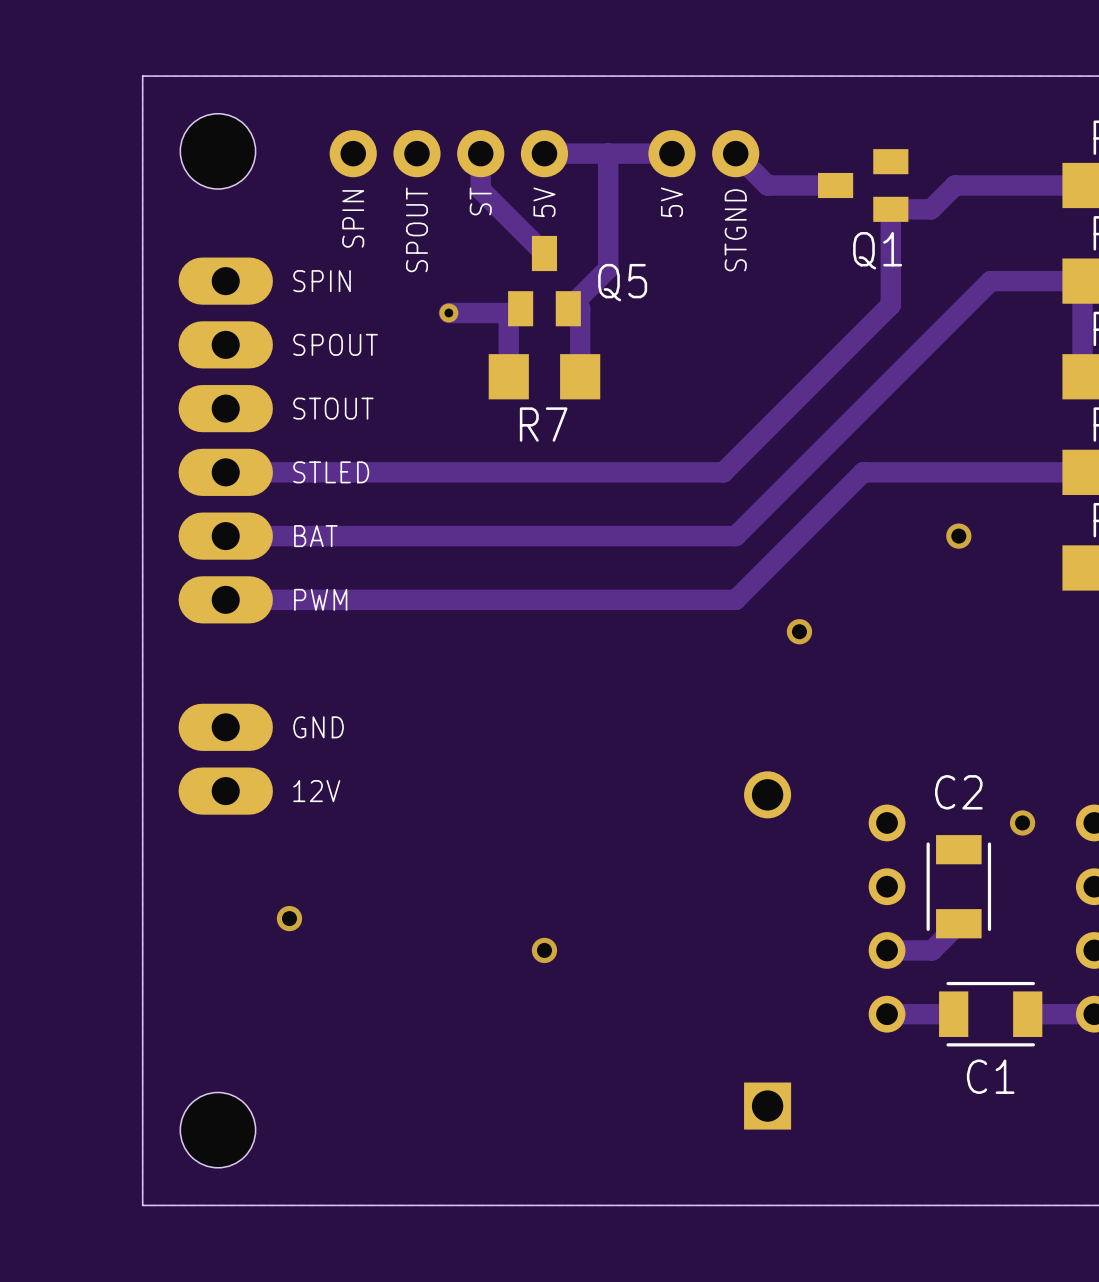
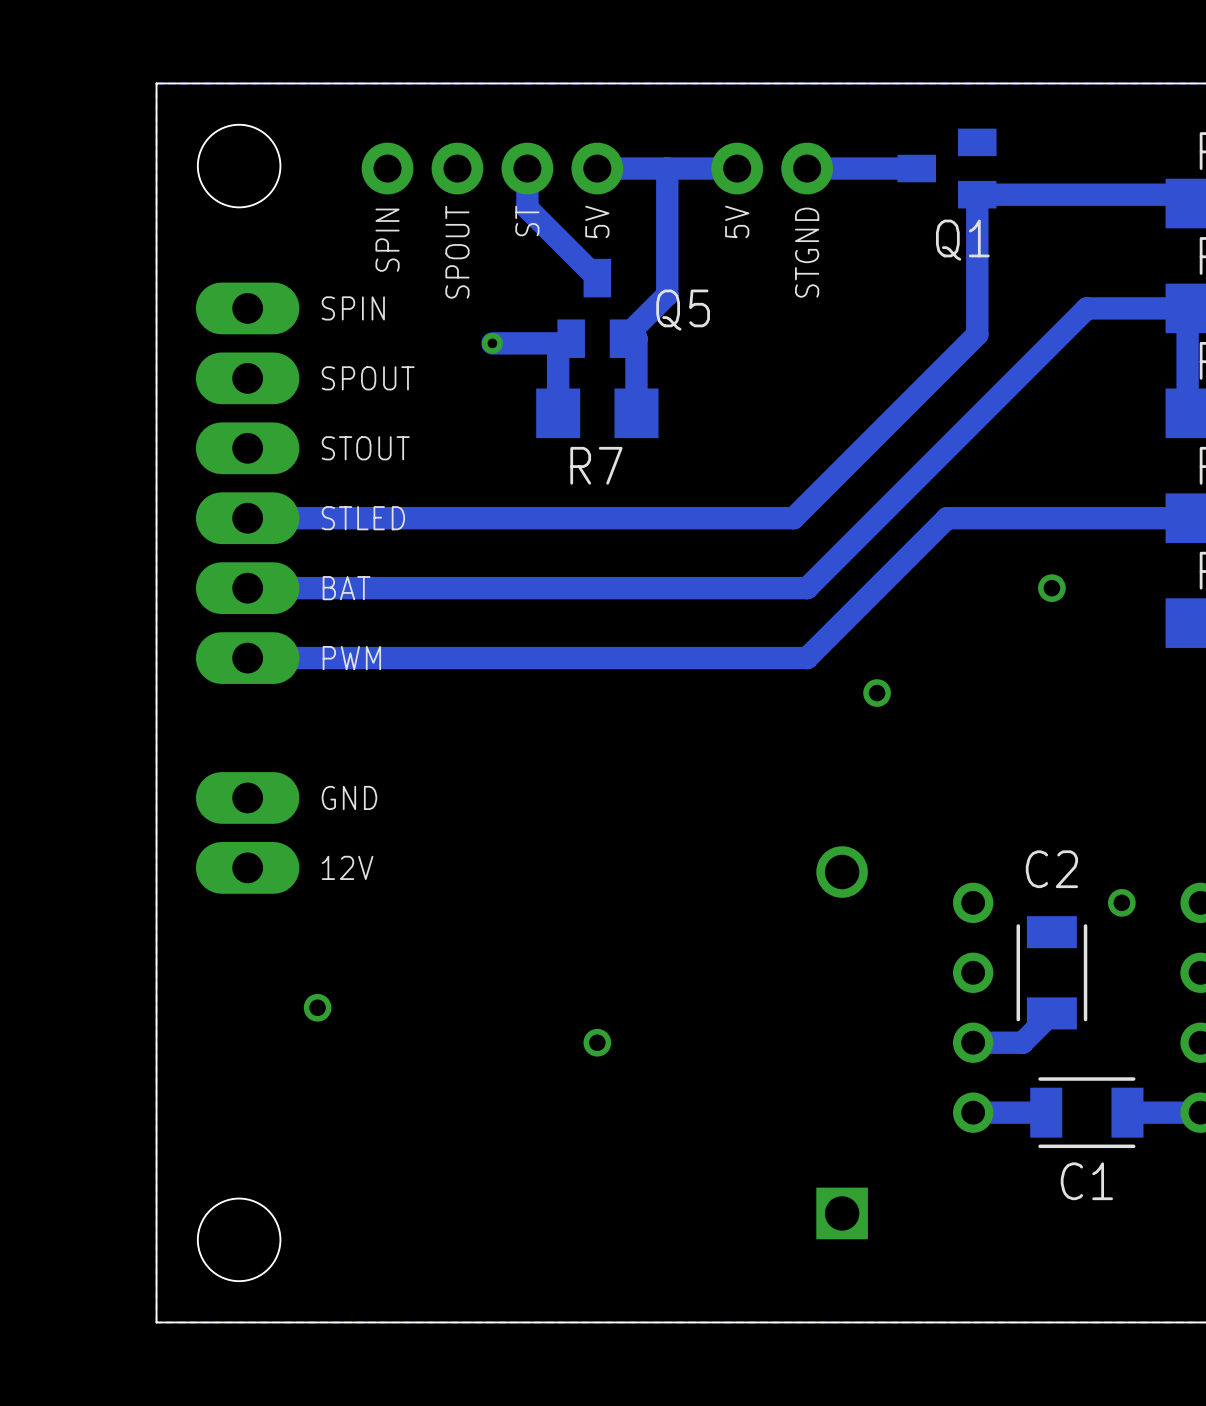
track: (735, 153) (767, 185) (835, 185) -> (807, 168) (916, 168)
Q1 position: (863, 185) -> (947, 168)
track: (1082, 185) (955, 185) (931, 209) (890, 209) -> (1187, 203) (1178, 194) (977, 194) (977, 229)

